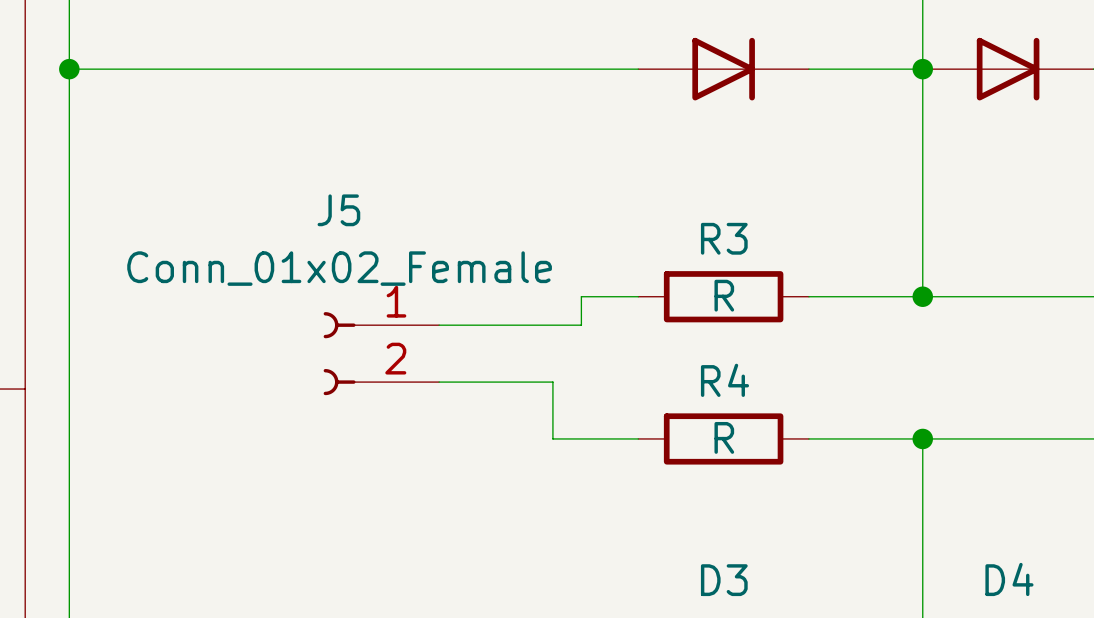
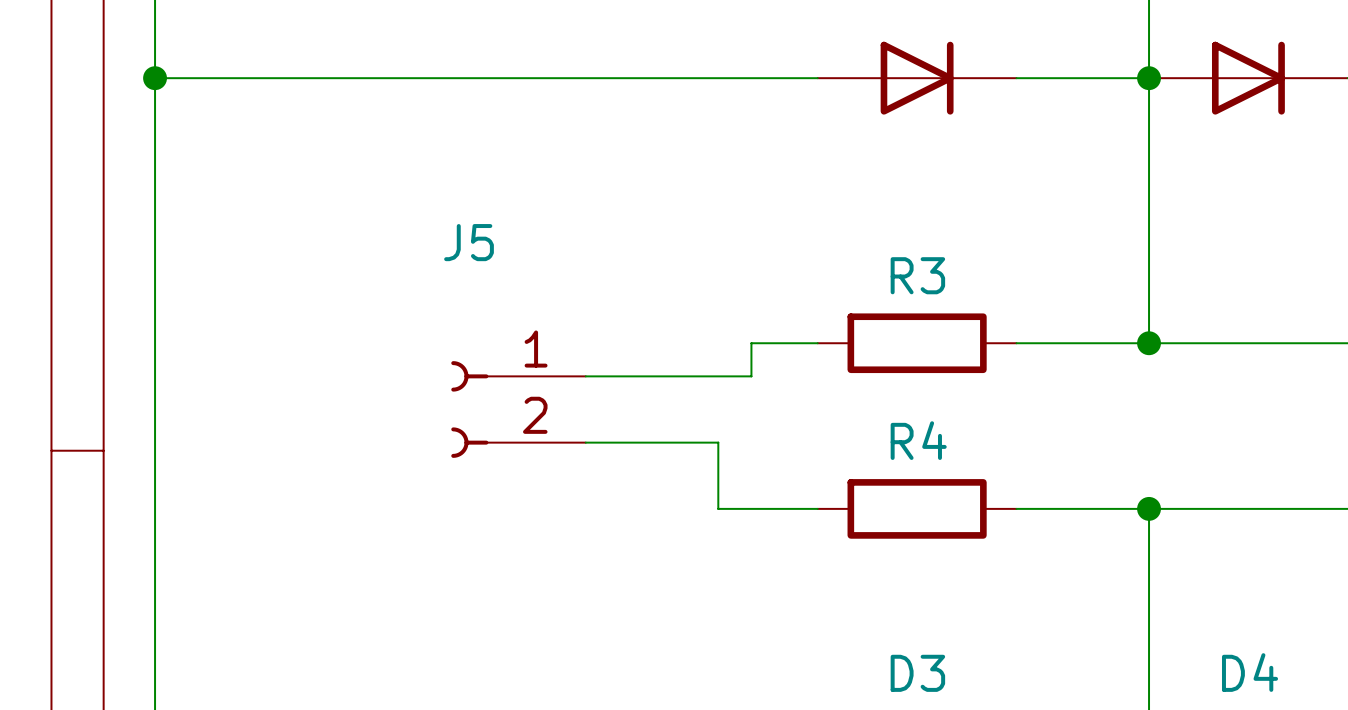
J5 value: Conn_01x02_Female (339, 268) -> none
R3 value: R (724, 295) -> none
R4 value: R (724, 437) -> none

